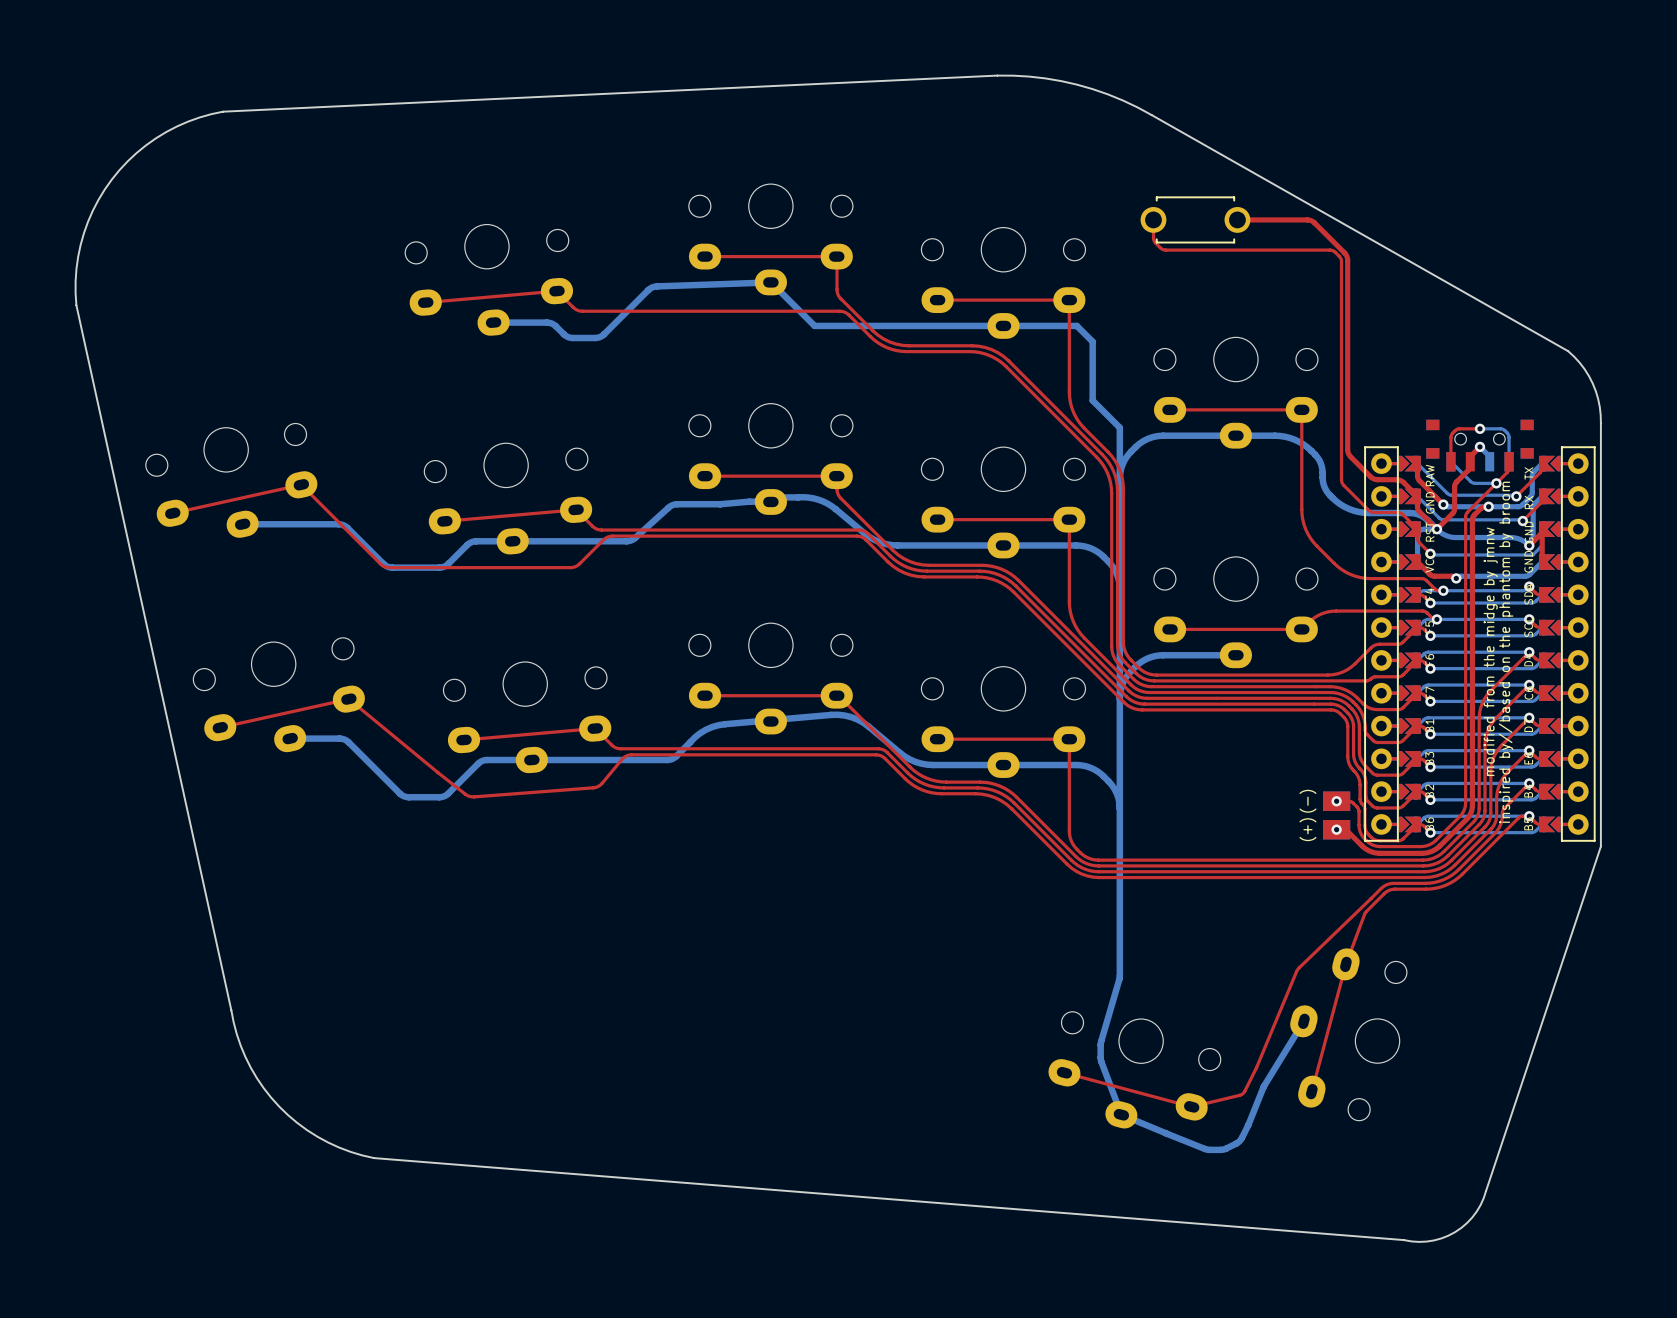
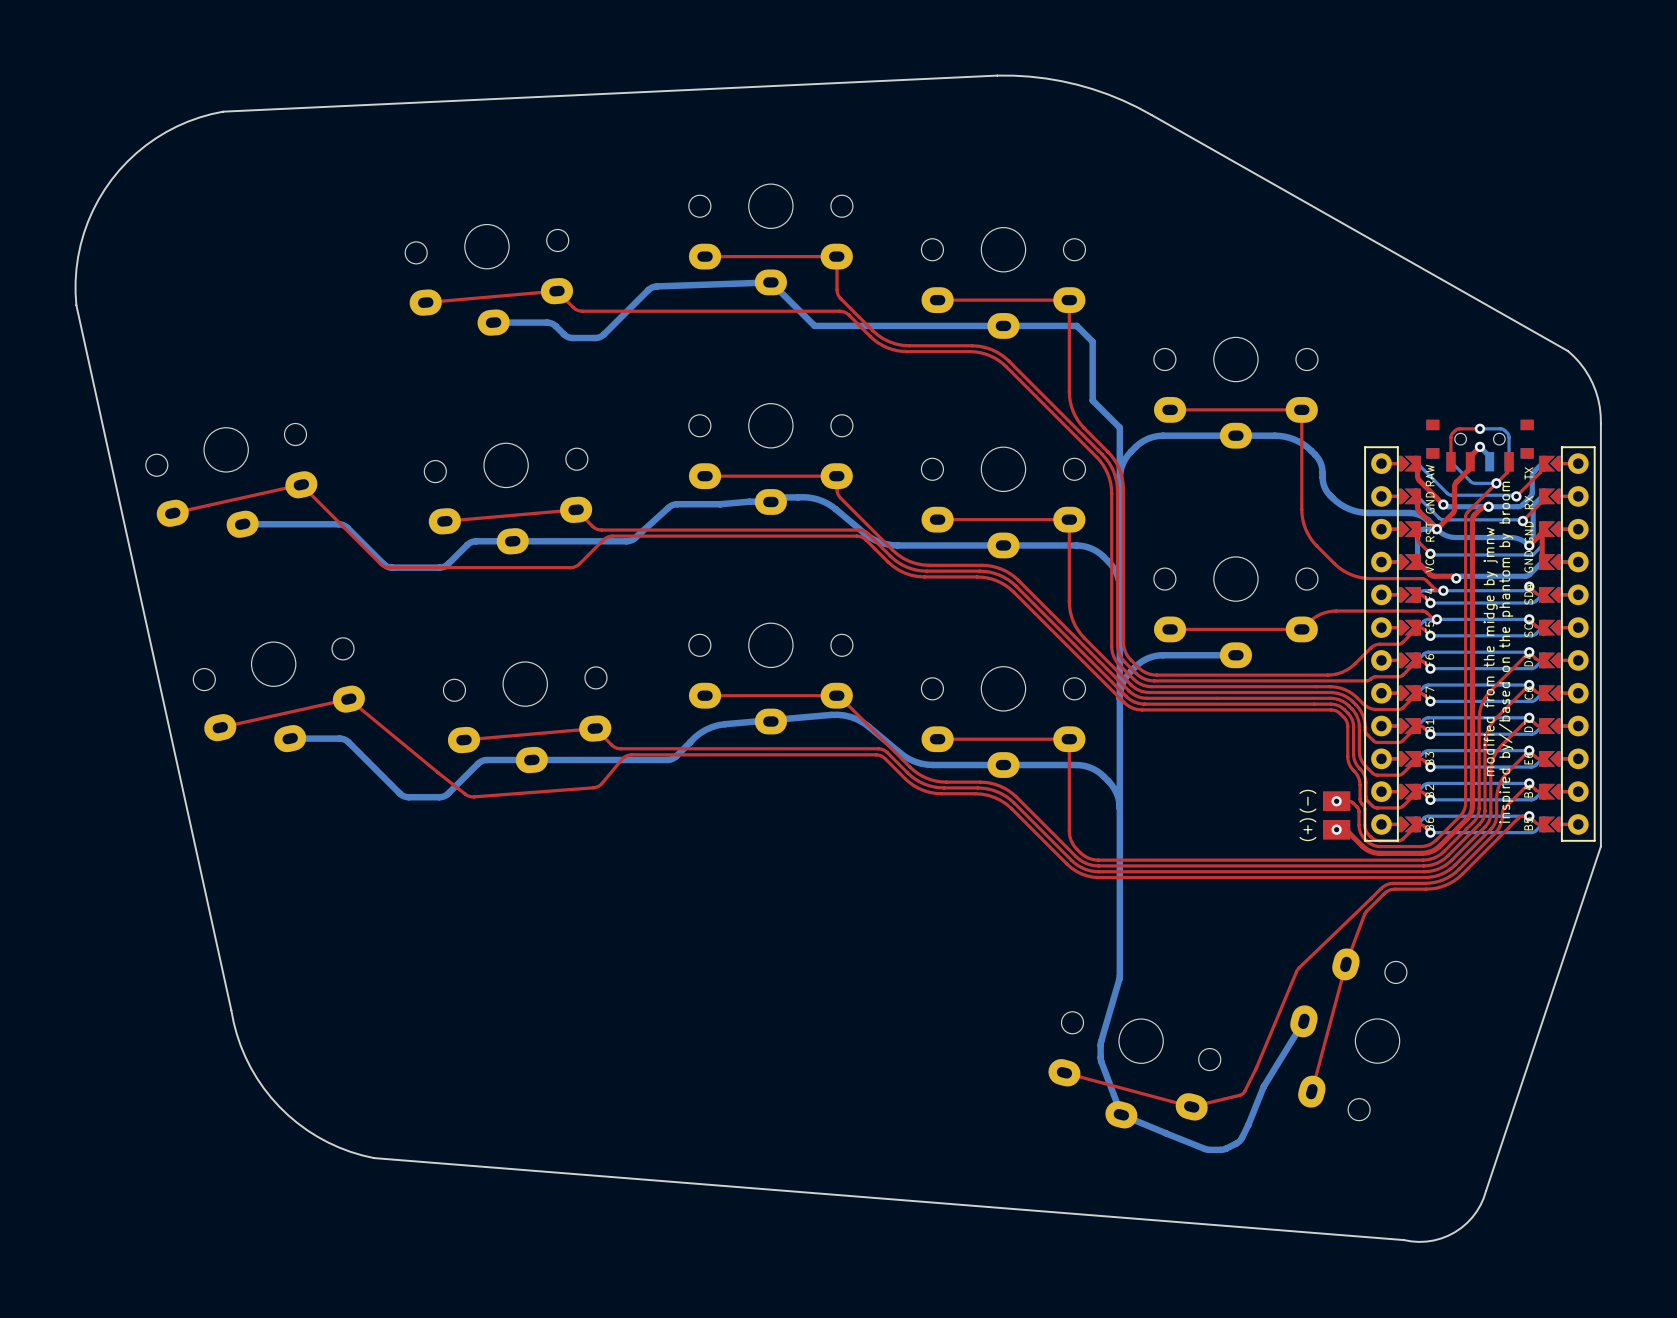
top track: (1153, 219) (1154, 240) (1164, 249) (1329, 250) (1339, 256) (1341, 261) (1341, 482) (1369, 511) (1400, 513) (1417, 529) -> none
part: (1195, 219) -> none
top track: (1237, 219) (1309, 220) (1345, 254) (1347, 260) (1348, 452) (1372, 478) (1400, 480) (1417, 496) -> none

